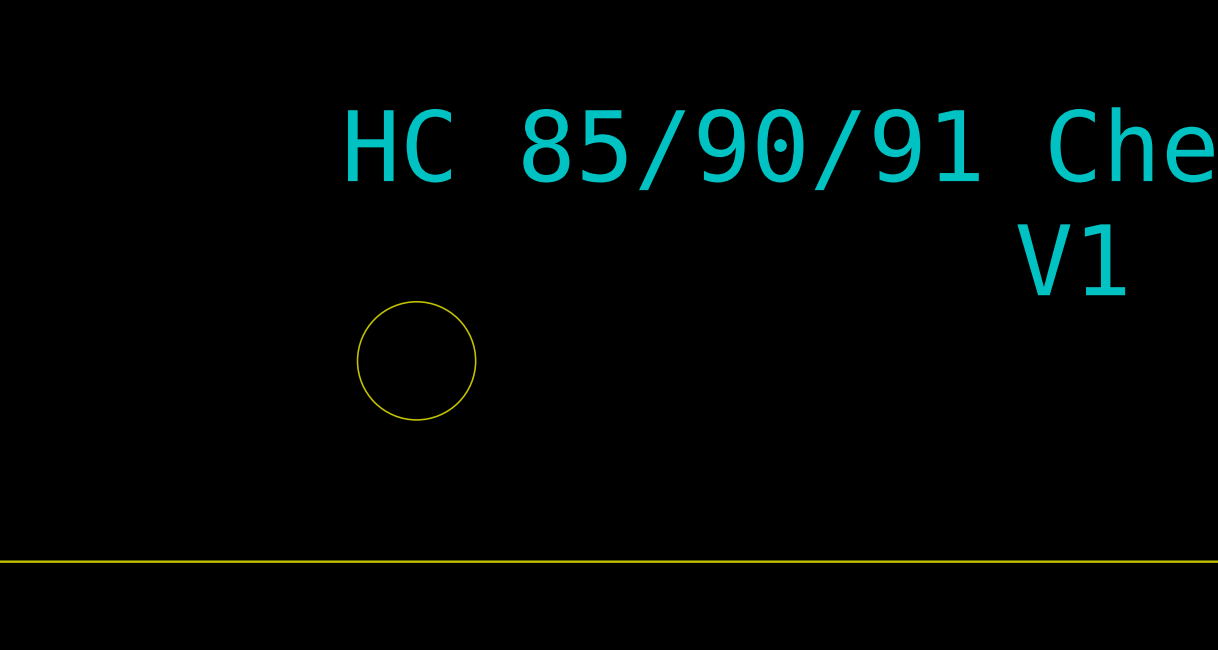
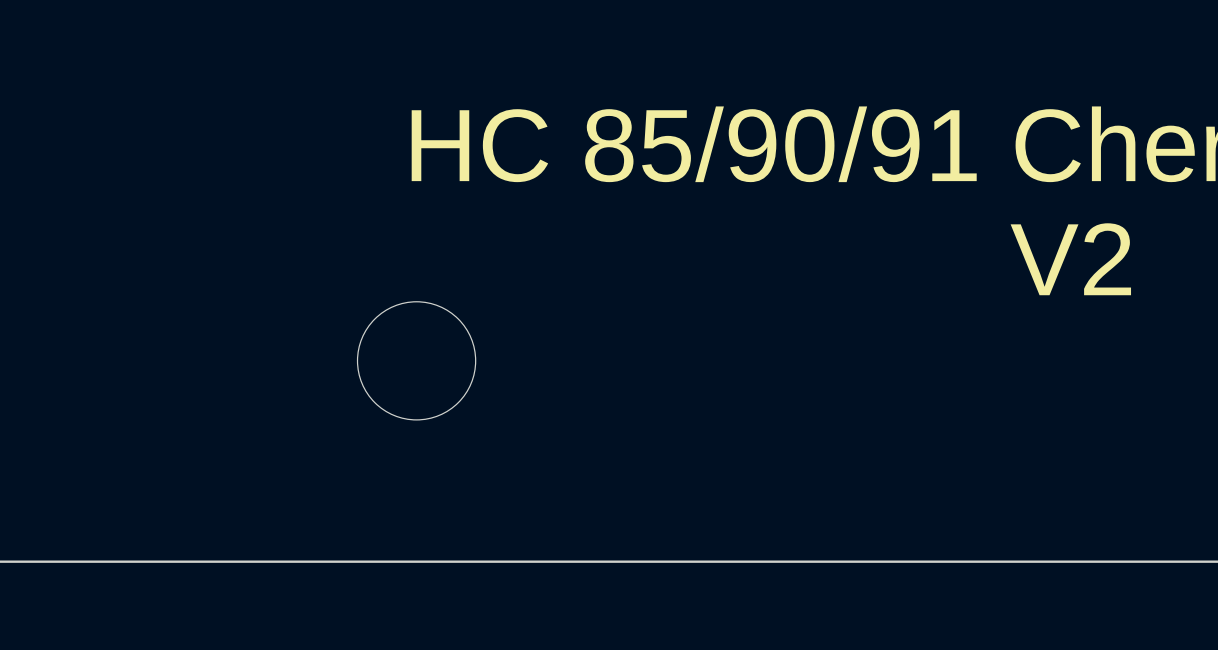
text: V1 (1071, 259) -> V2 (1070, 259)

